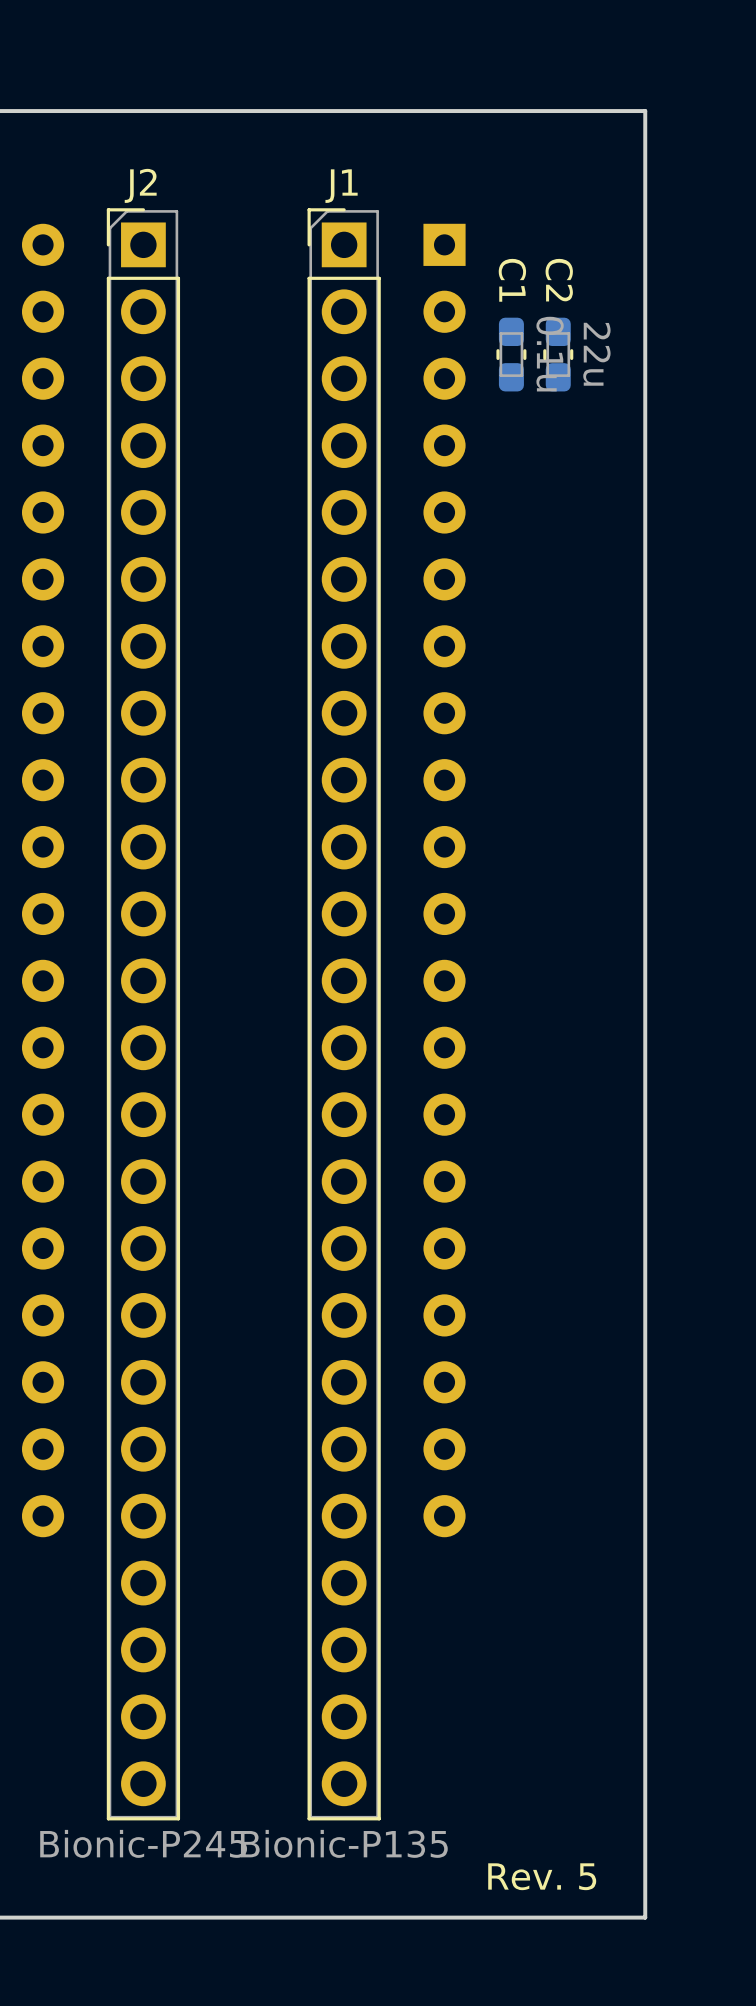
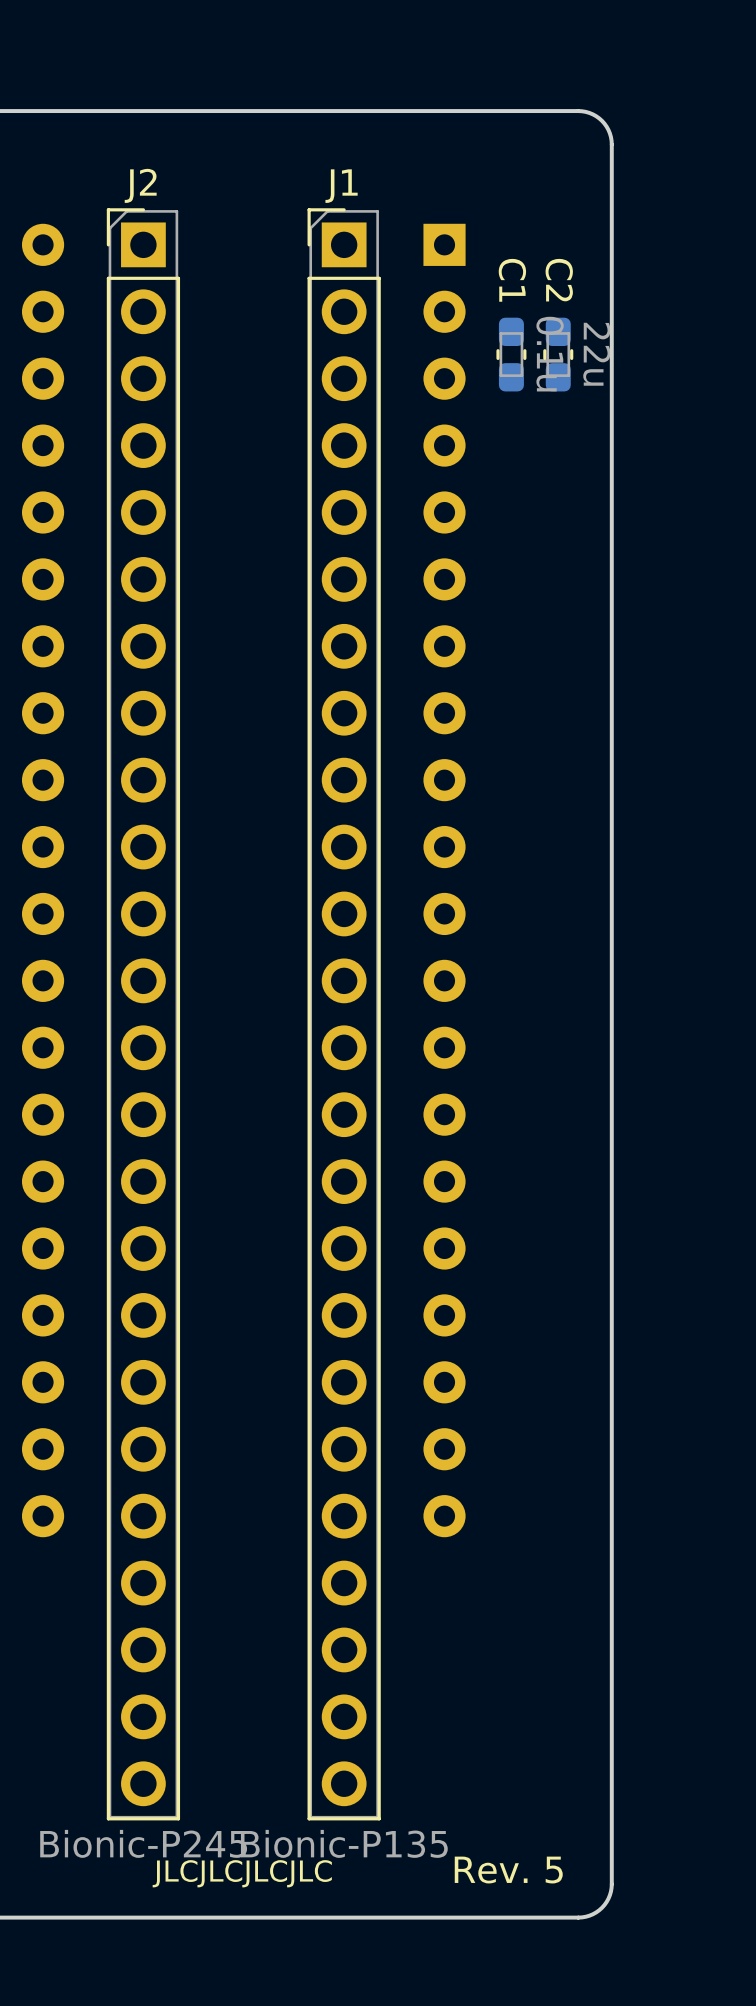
board edge: (578, 111) (645, 111) (645, 1917) (578, 1917) -> (578, 111) (589, 112) (601, 120) (609, 133) (611, 144) (611, 1884) (609, 1895) (601, 1907) (589, 1915) (578, 1917)
text: none -> JLCJLCJLCJLC (242, 1873)
text position: Rev. 5 (542, 1876) -> Rev. 5 (508, 1870)

